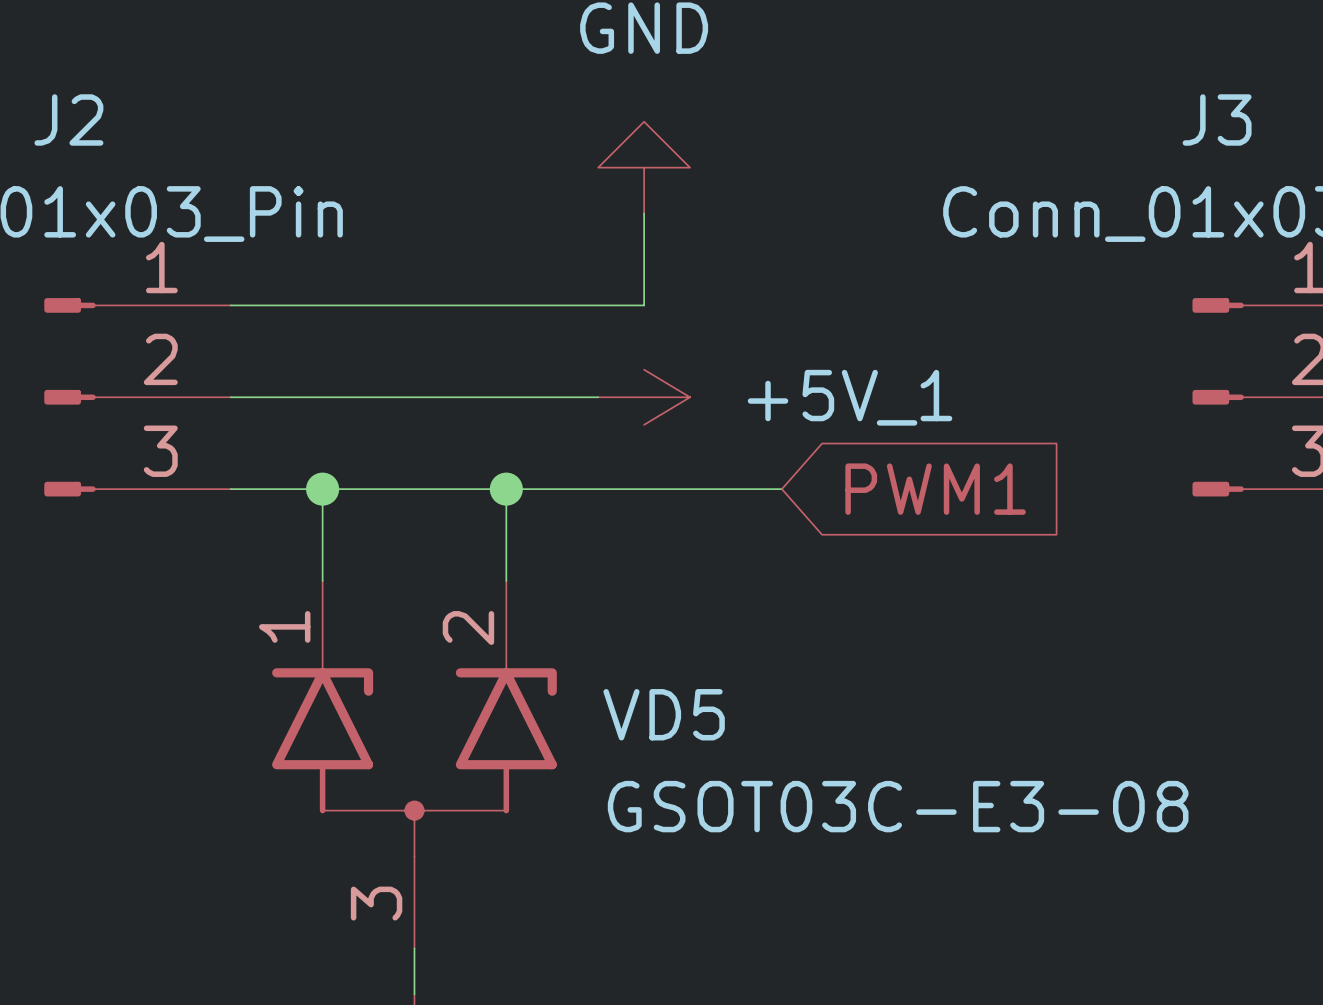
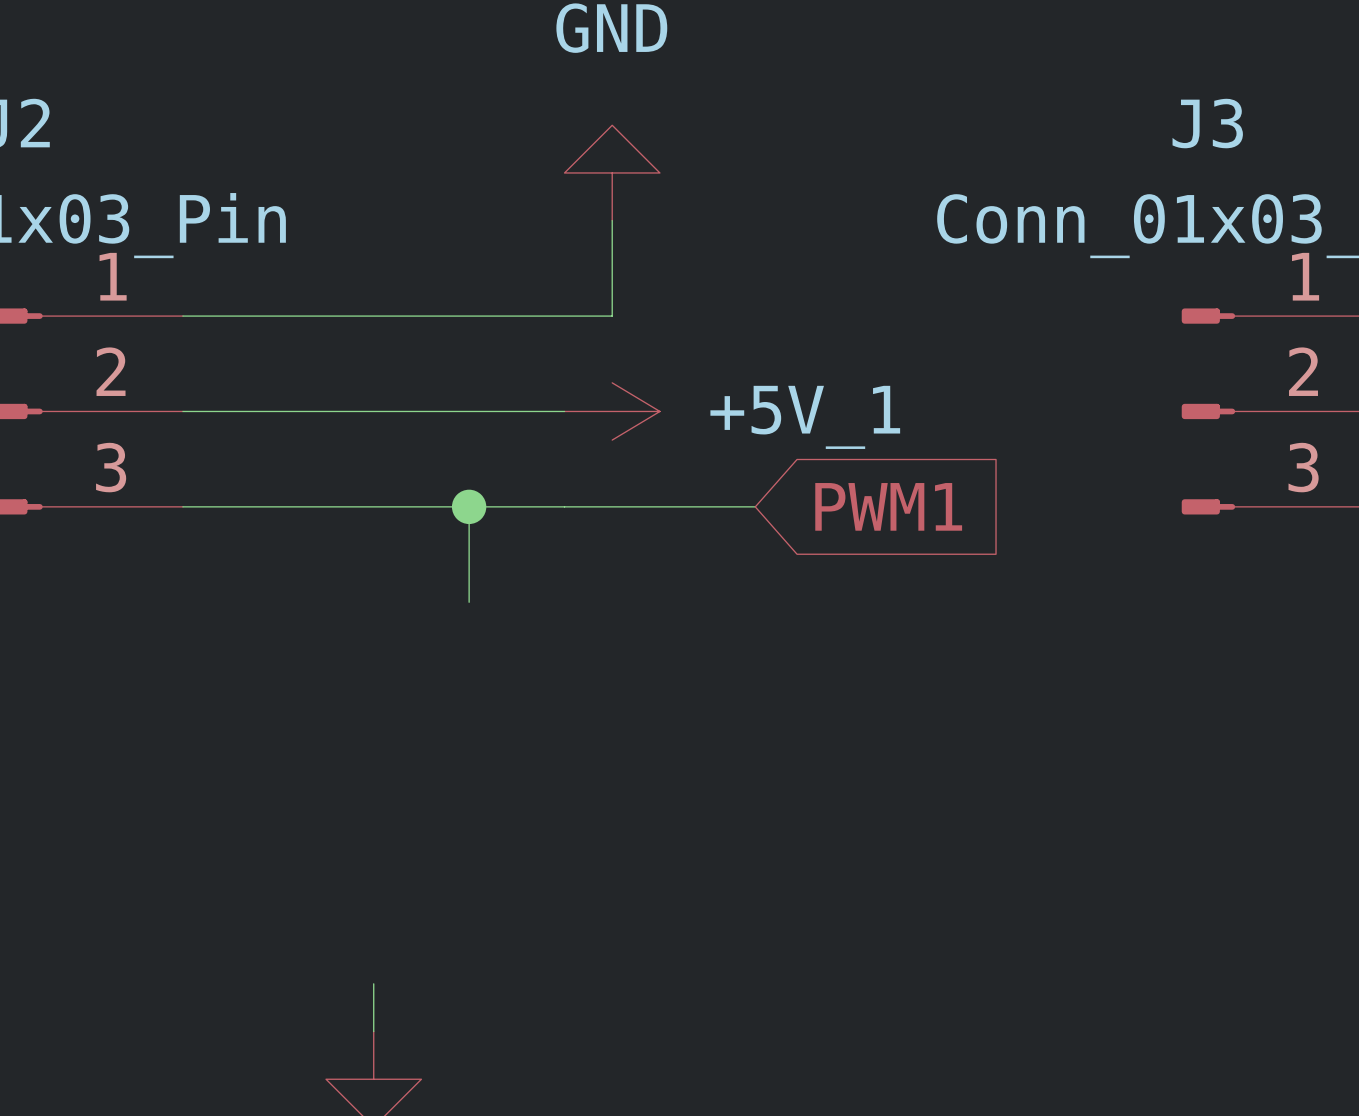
wire: (322, 489) (322, 580) -> none
junction: (322, 489) -> none
VD5: GSOT03C-E3-08 (414, 764) -> none

